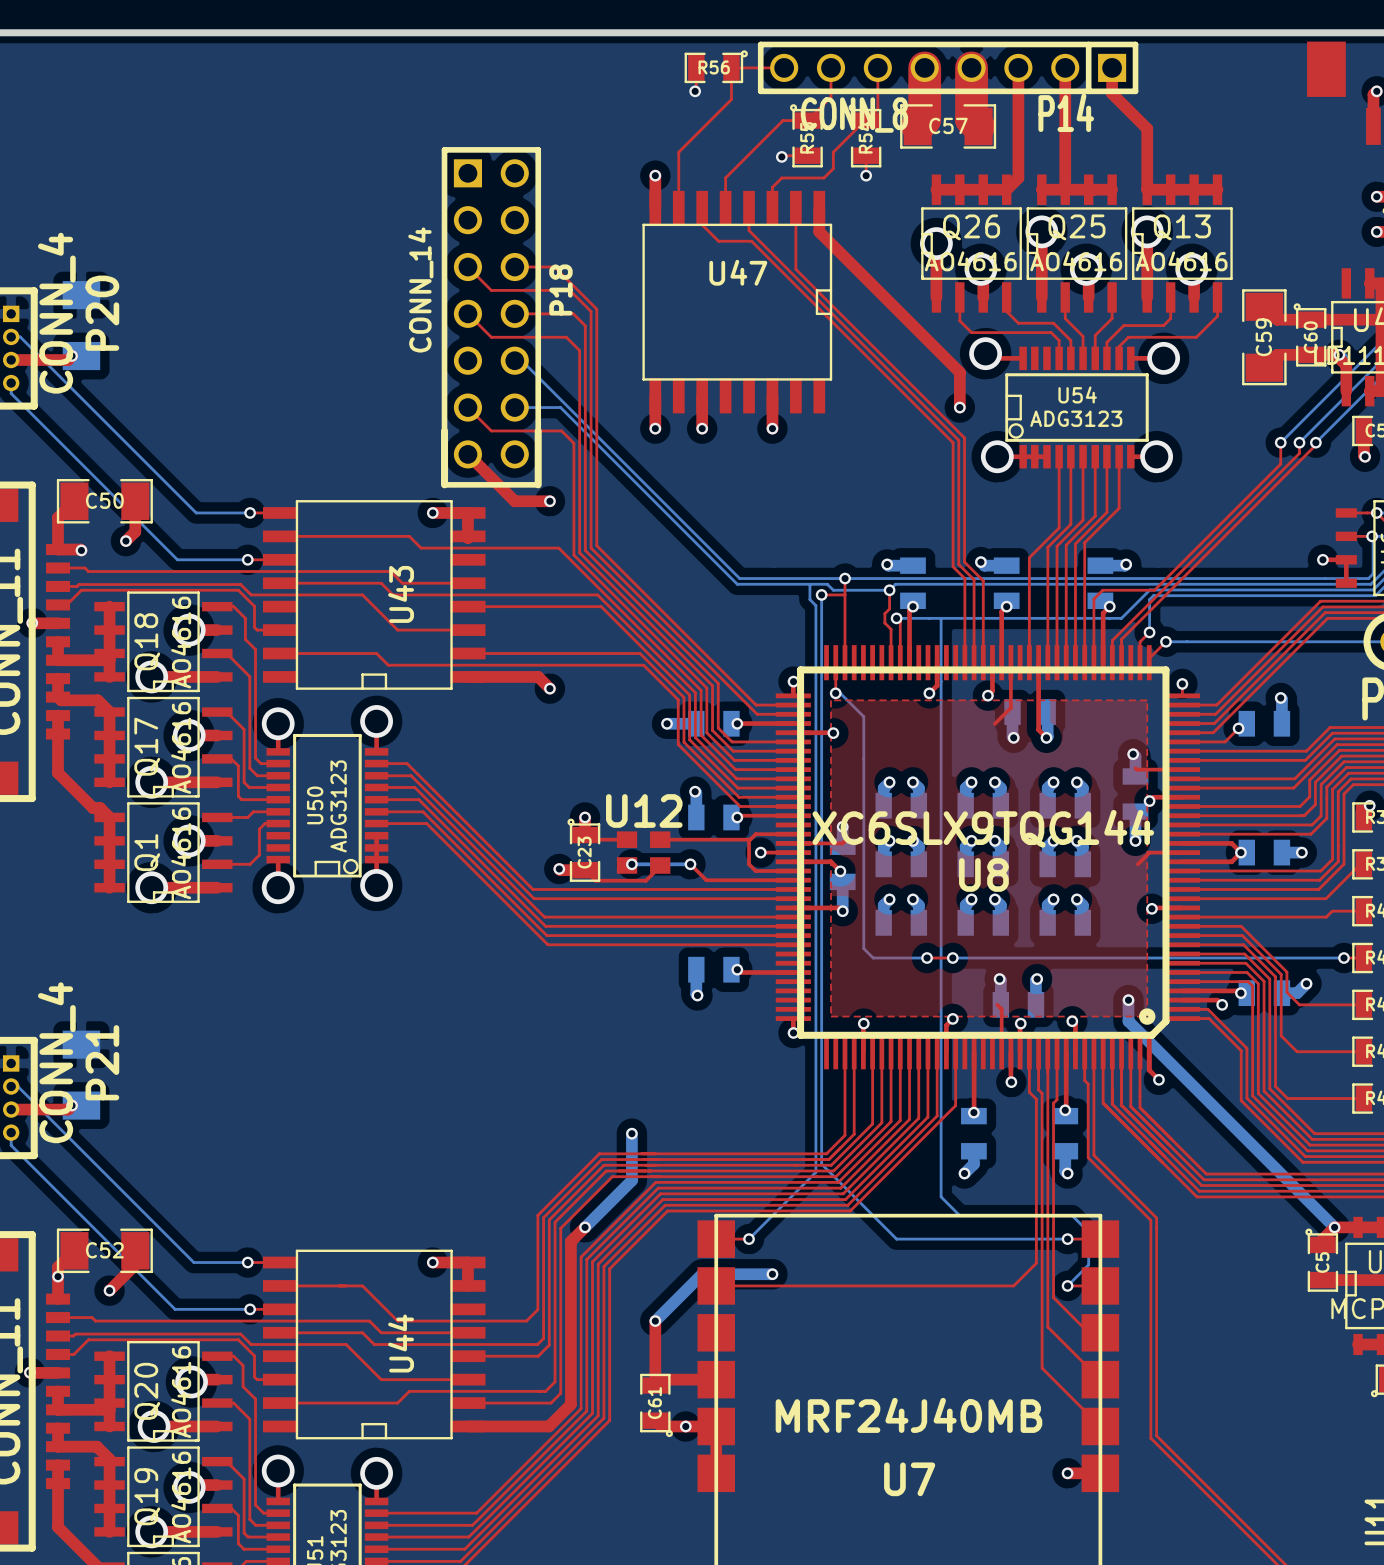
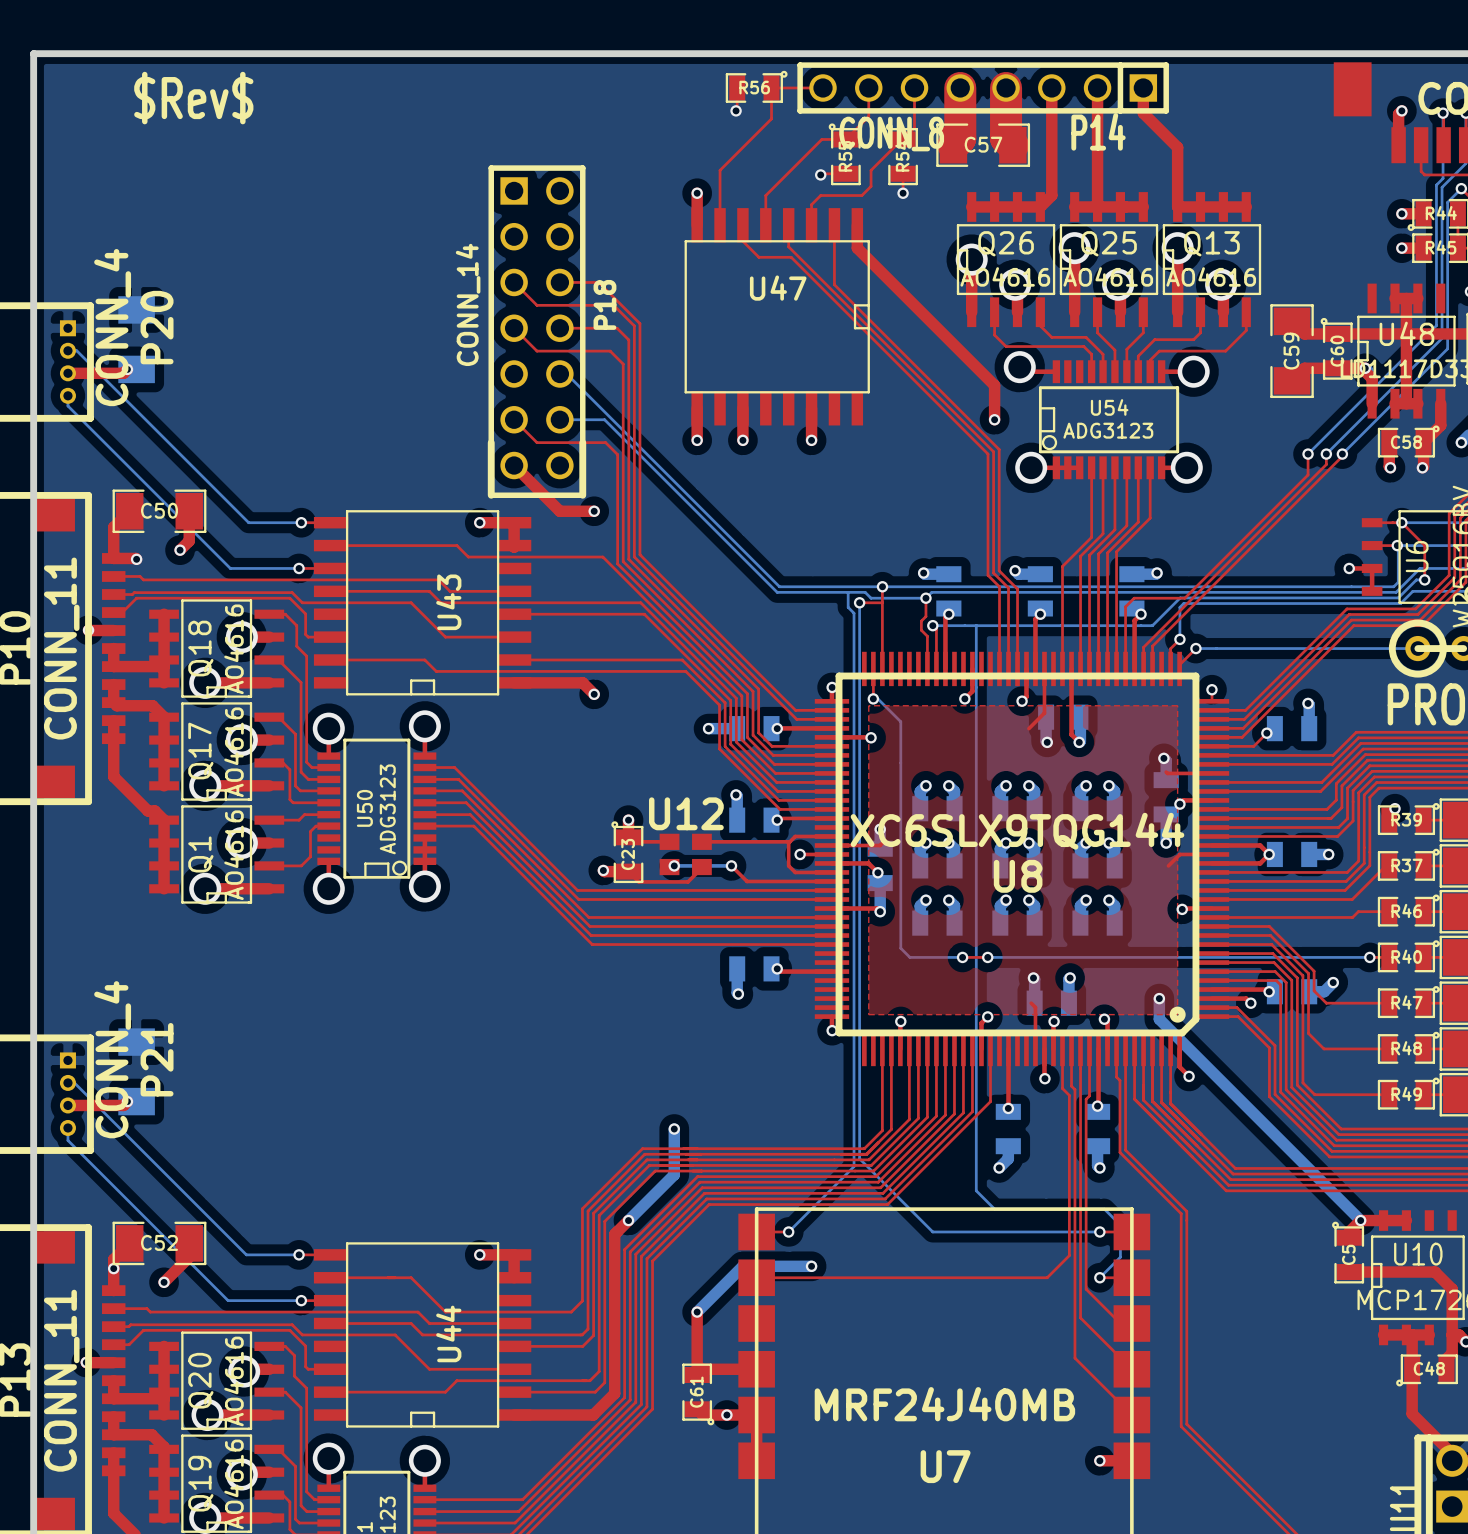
text: none -> $Rev$ (193, 98)

